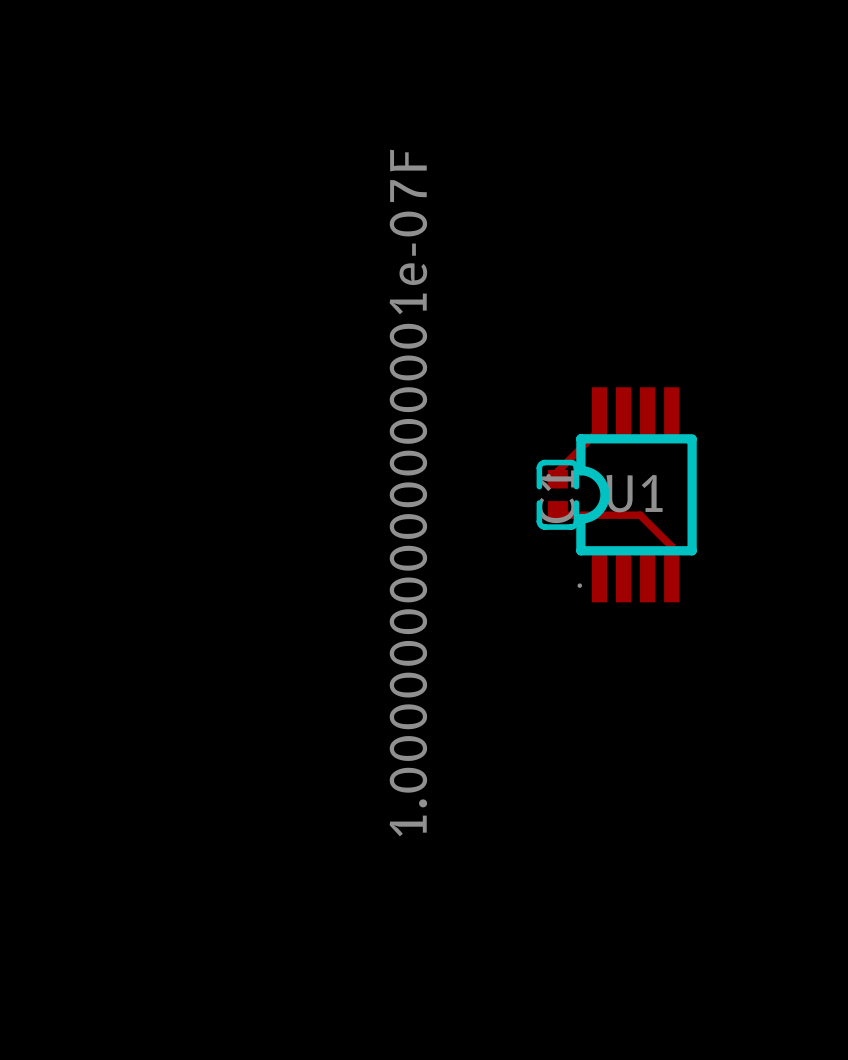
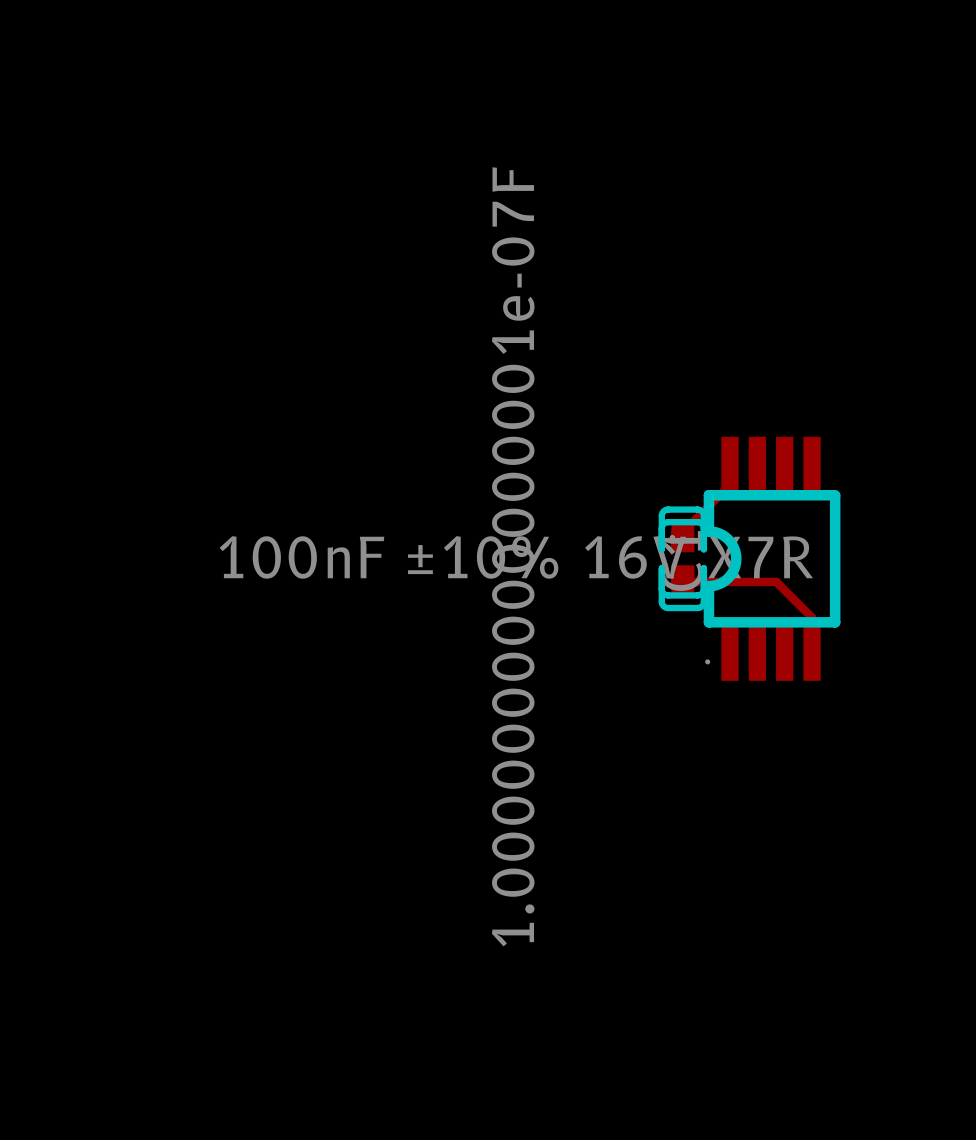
U1 name: U1 (634, 493) -> none
part: none -> 100nF ±10% 16V X7R (682, 558)

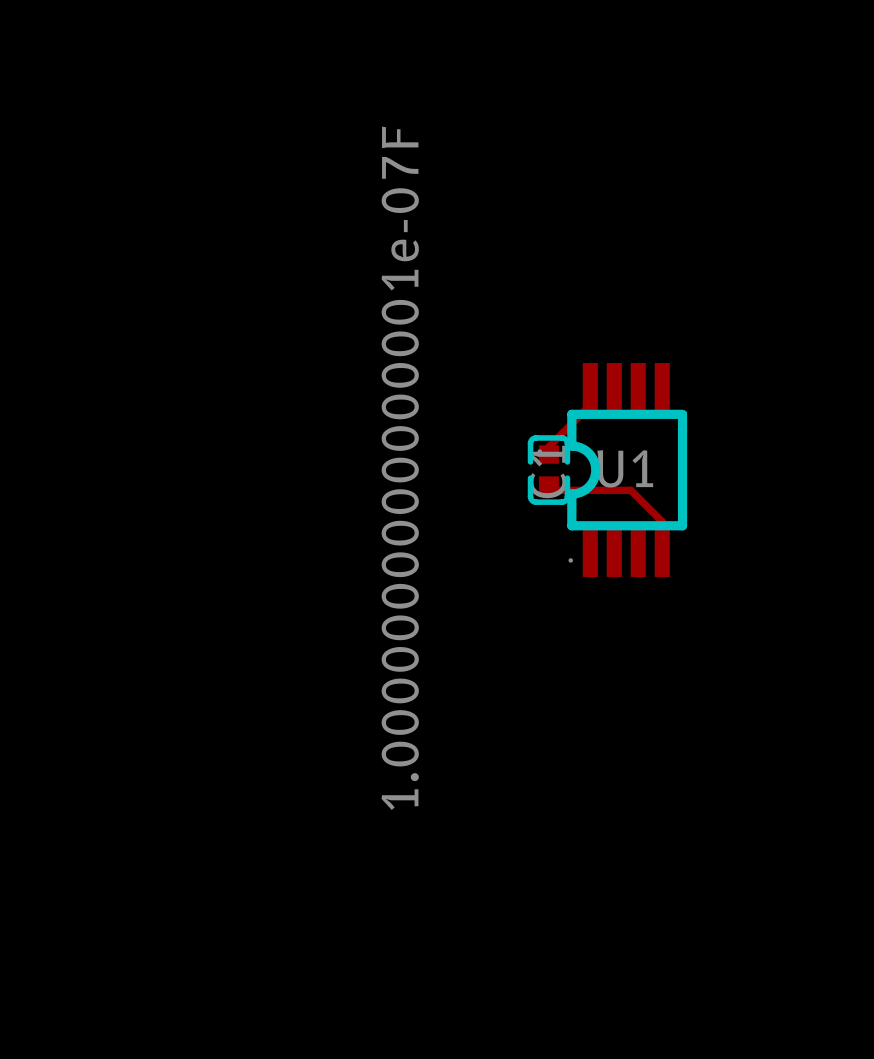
U1 name: none -> U1 (625, 468)
part: 100nF ±10% 16V X7R (682, 558) -> none

